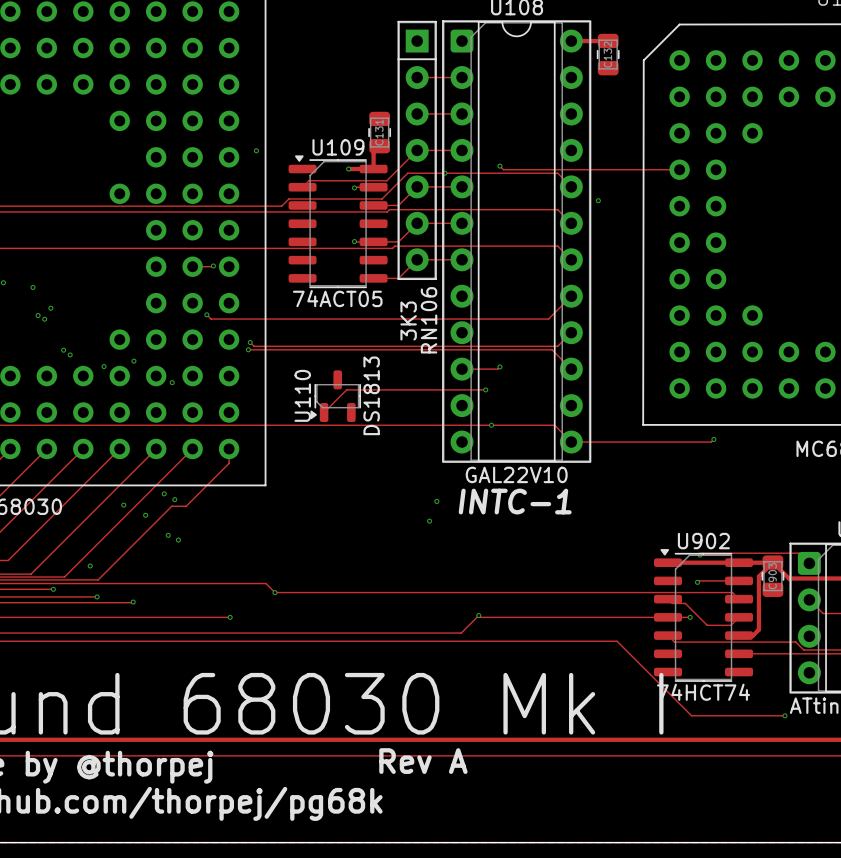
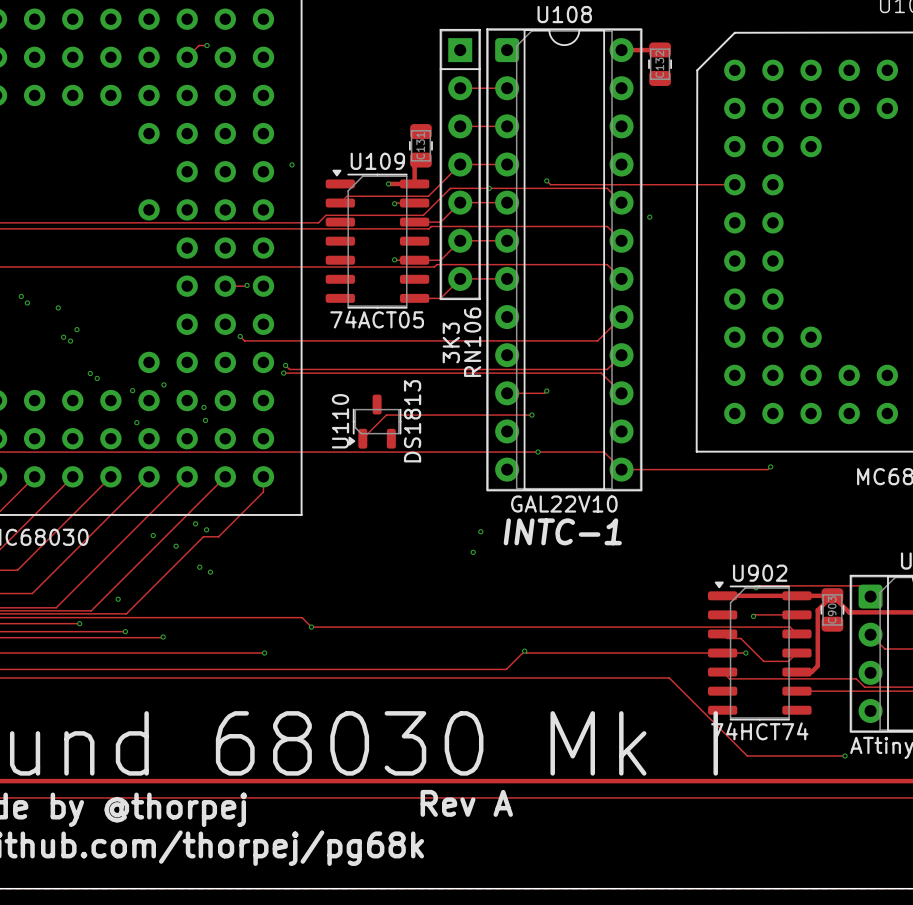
track: none -> (207, 45) (199, 45) (187, 57)
via: none -> (207, 45)
via: none -> (205, 420)
via: none -> (136, 422)

